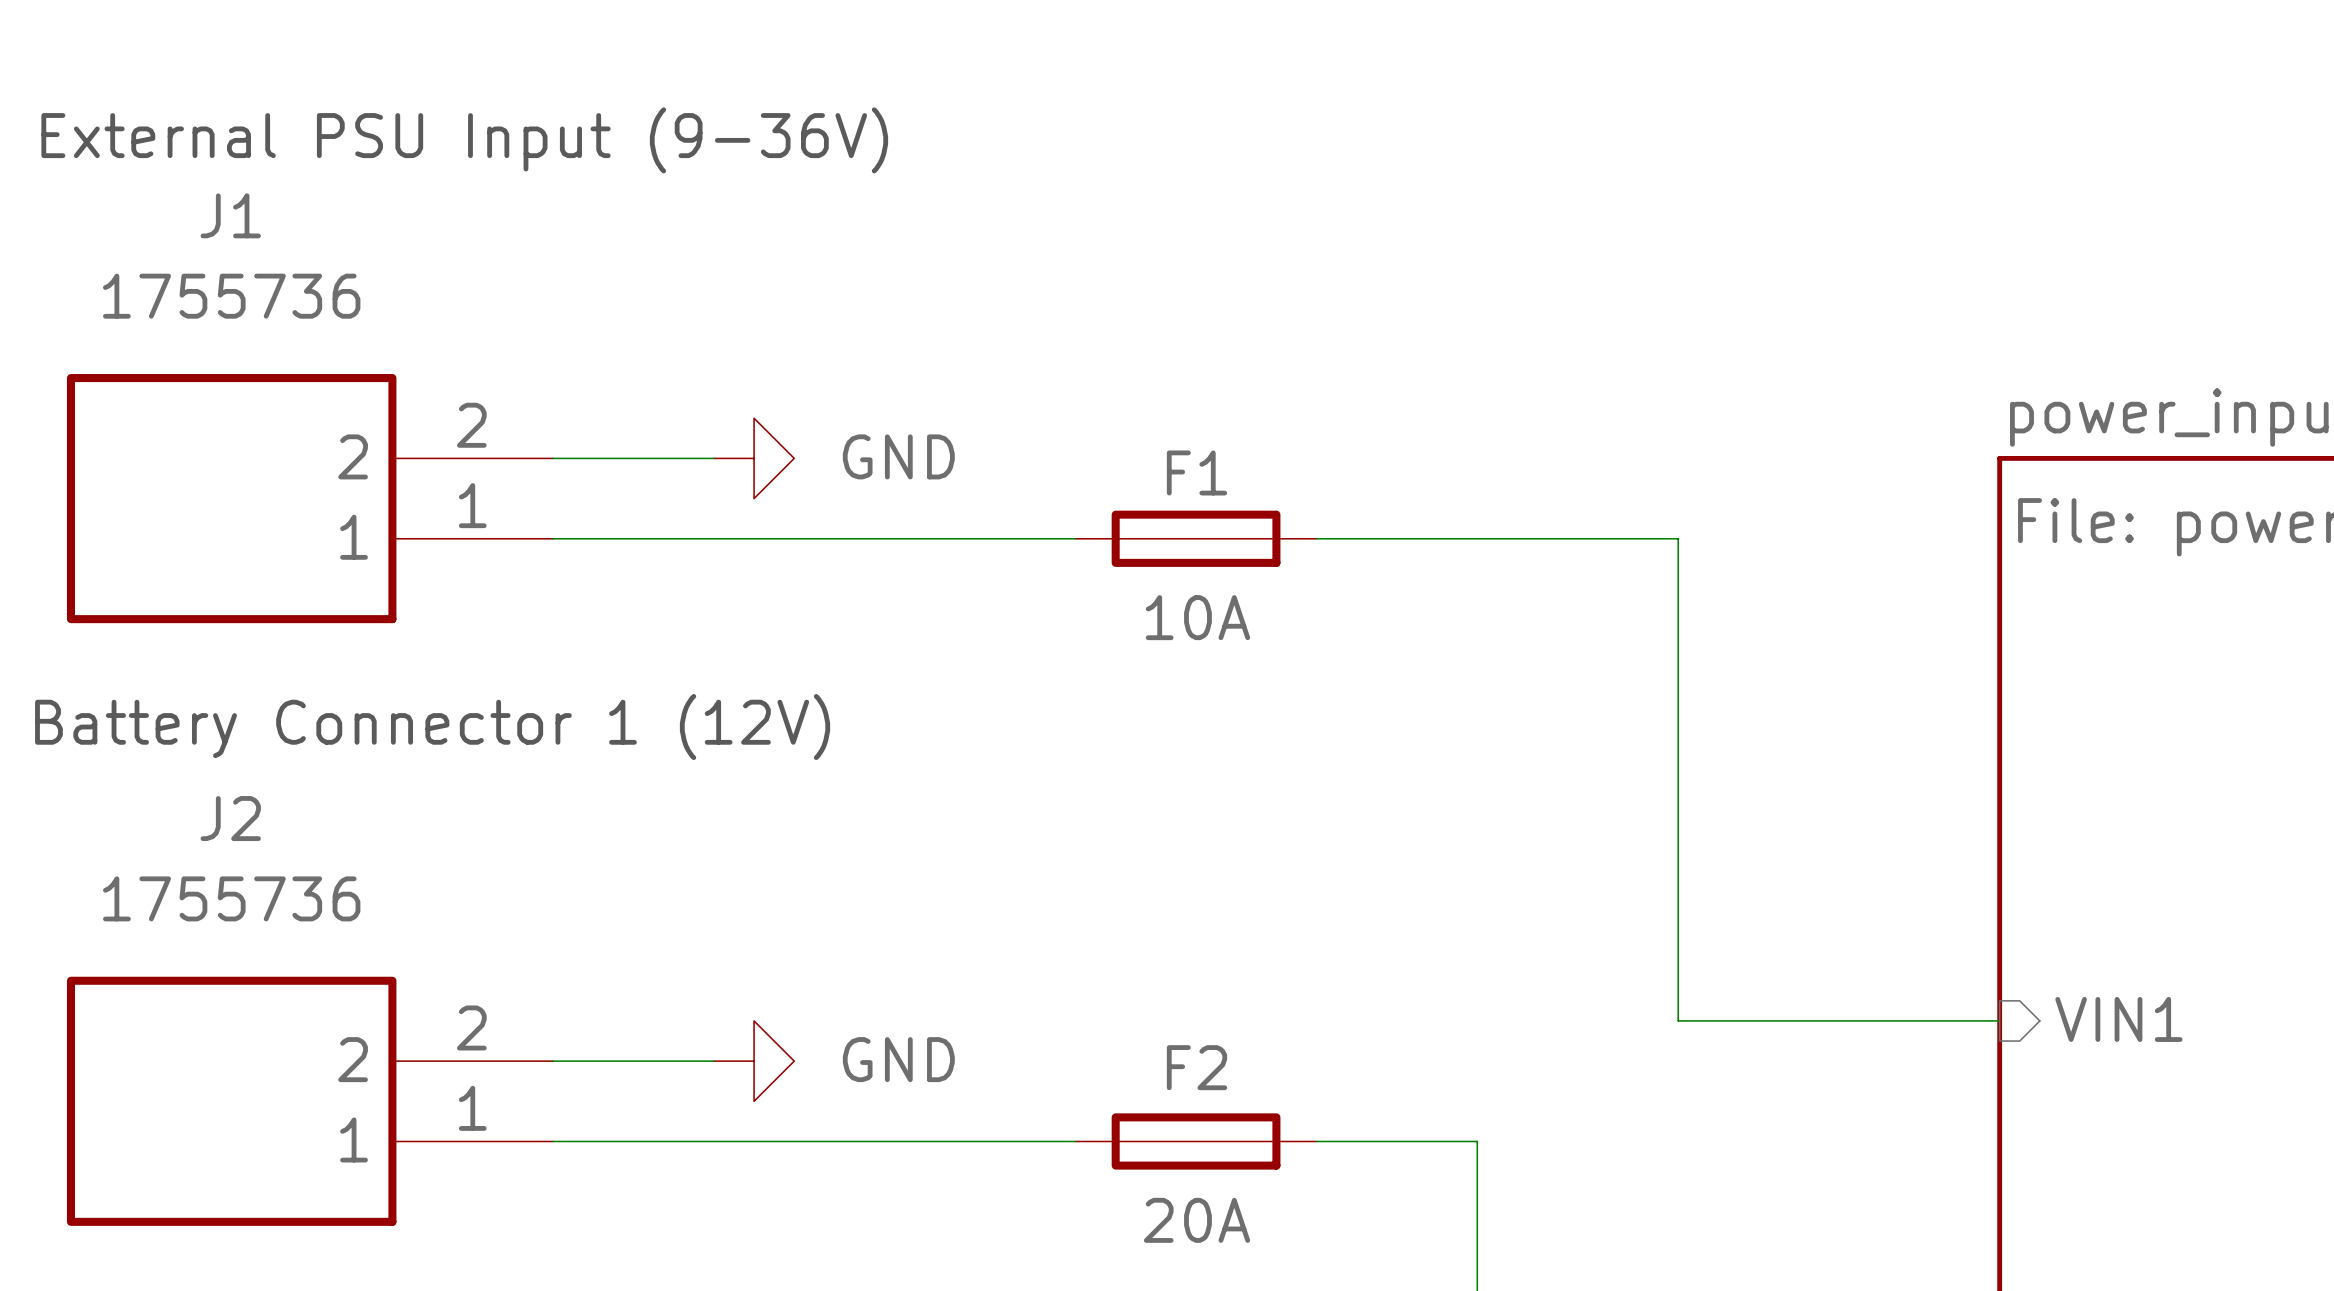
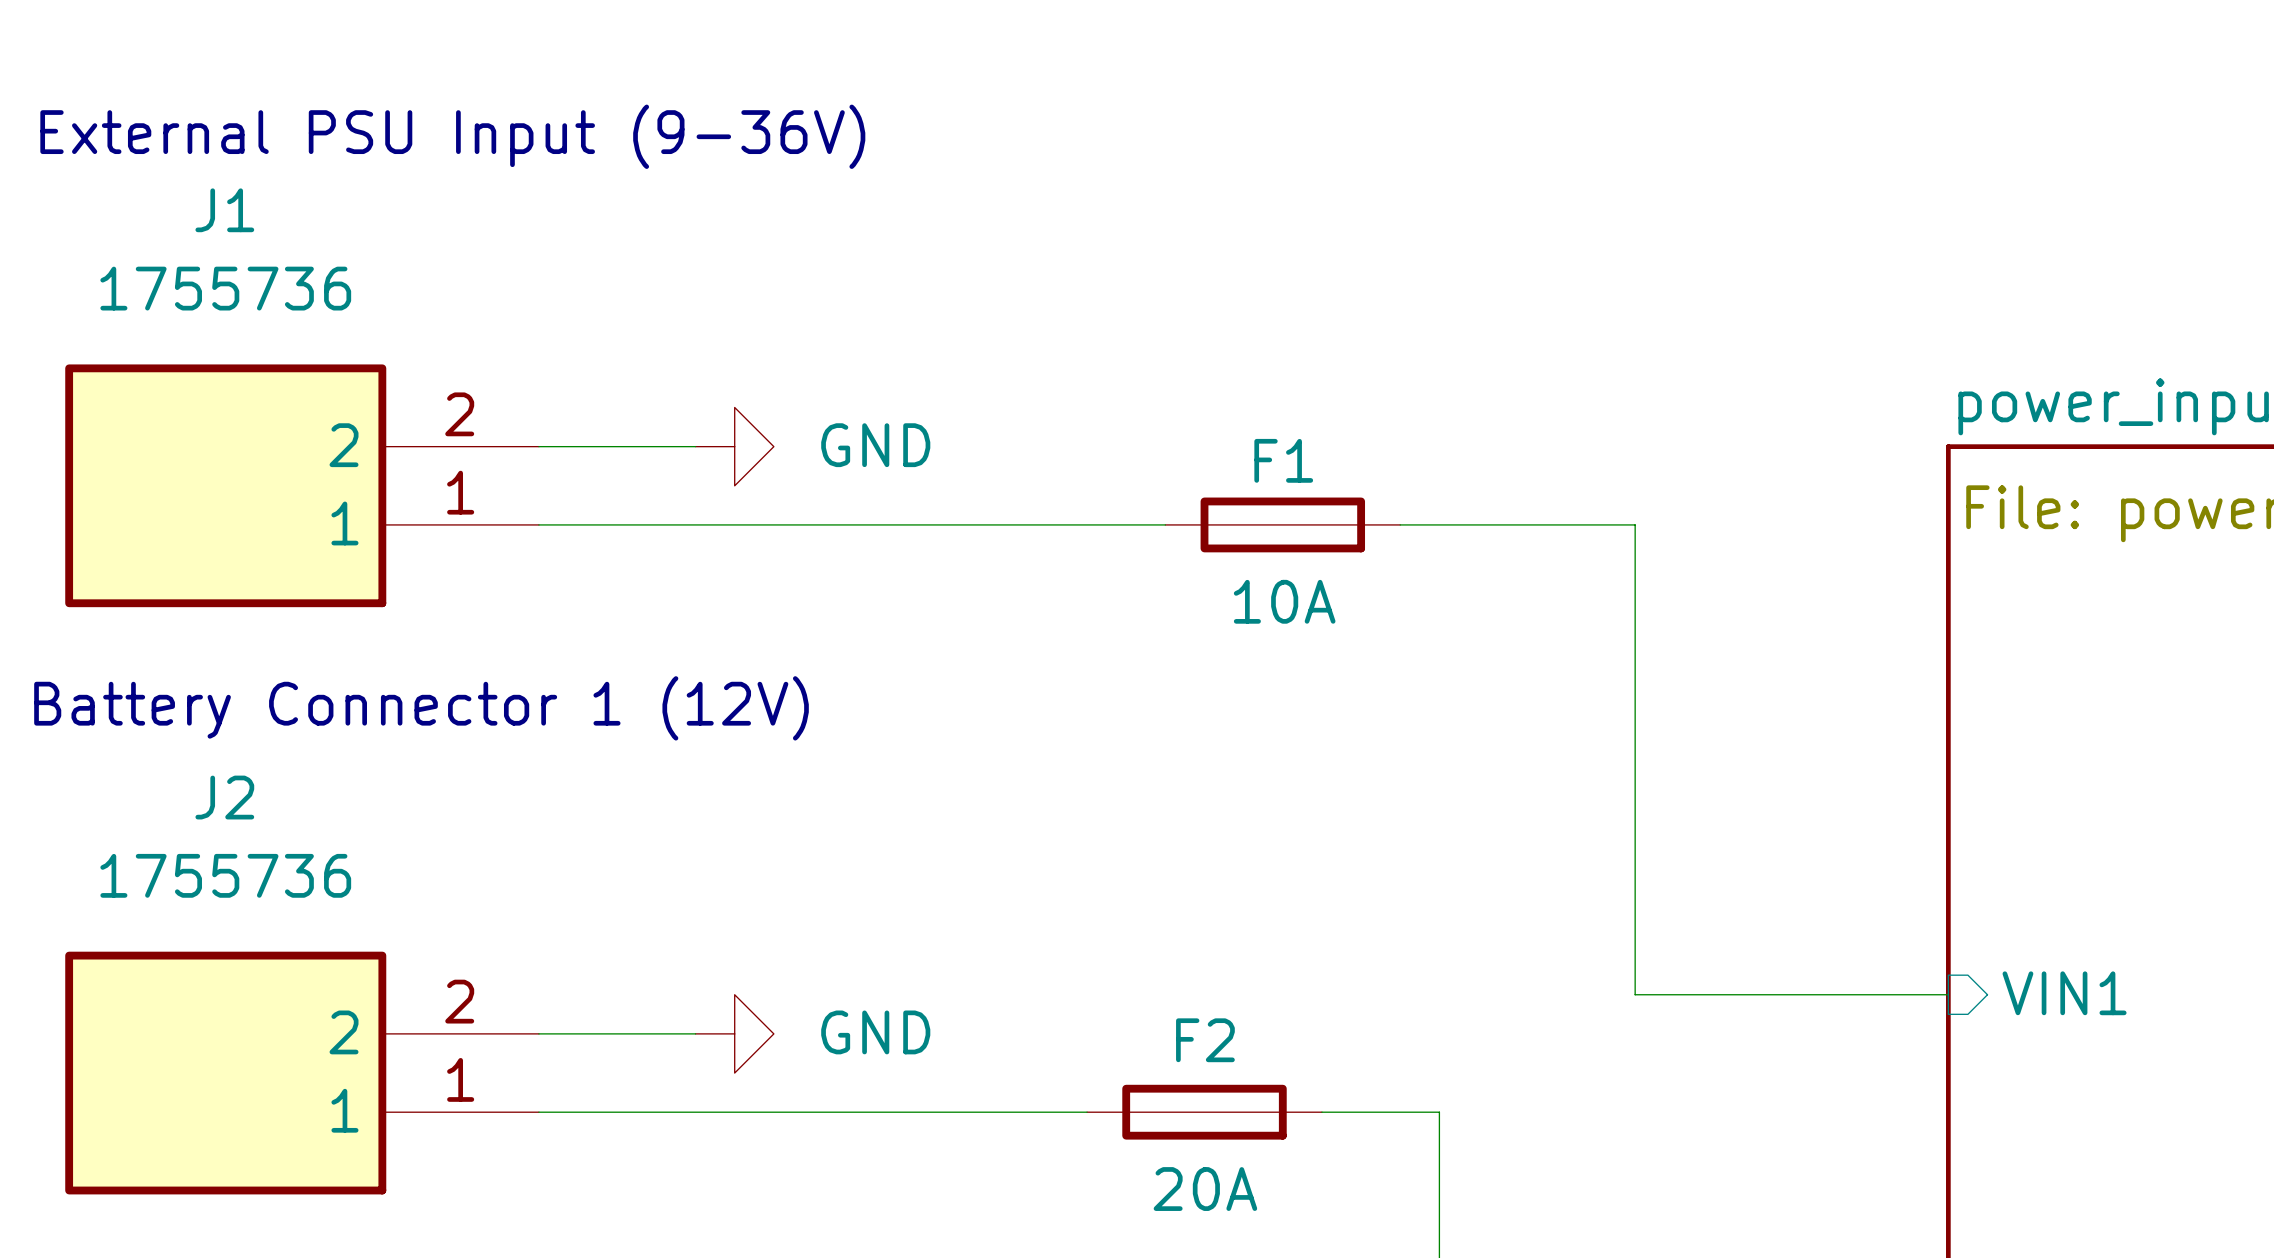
F1 position: (1196, 538) -> (1282, 524)
F2 position: (1196, 1141) -> (1204, 1112)

